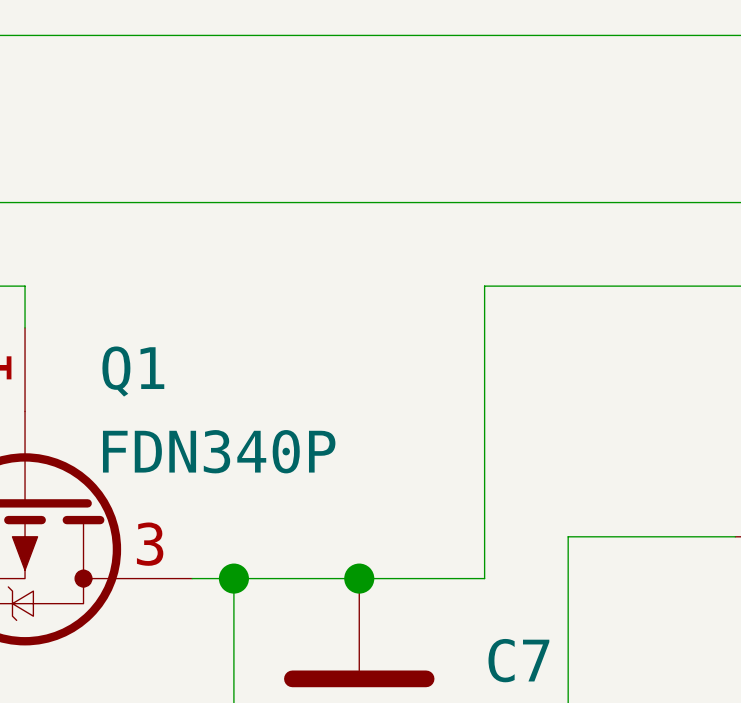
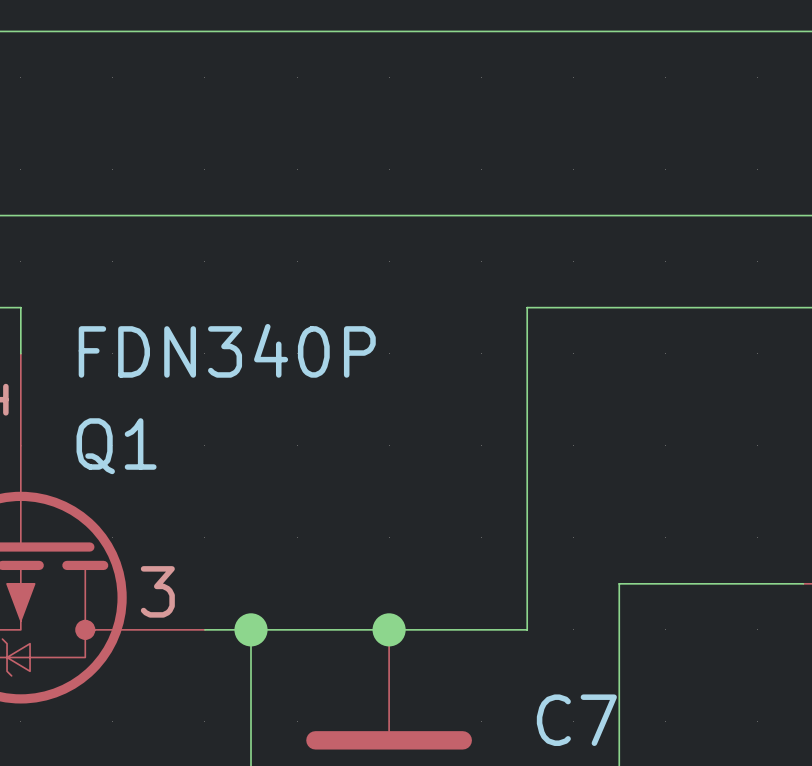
Q1 name position: Q1 (133, 371) -> Q1 (116, 446)
Q1 value position: FDN340P (219, 451) -> FDN340P (227, 350)

